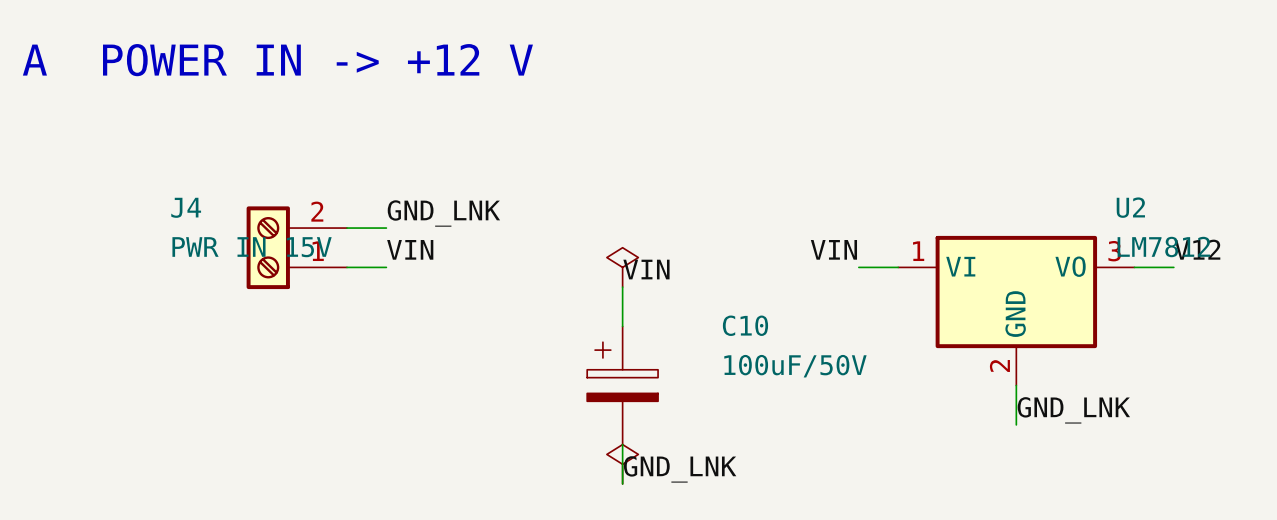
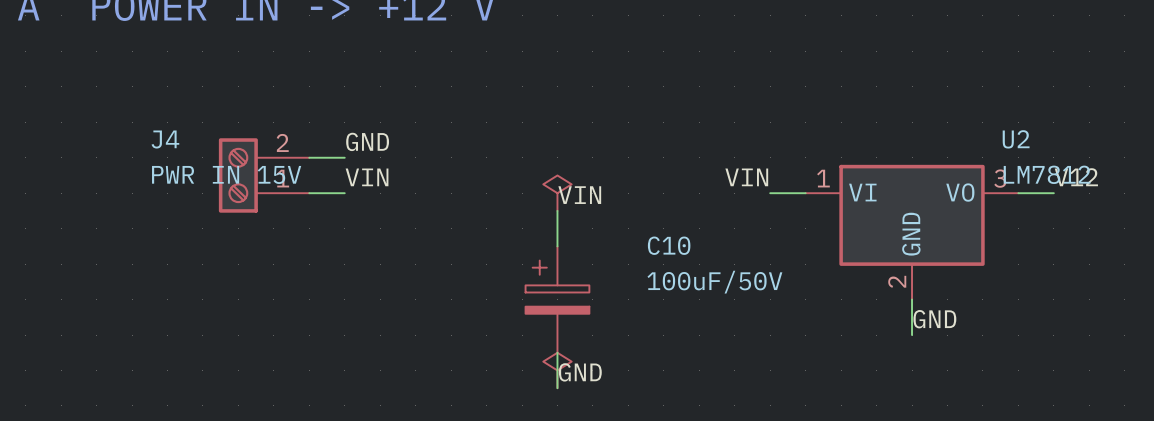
label: GND_LNK (443, 213) -> GND (367, 141)
label: GND_LNK (1073, 410) -> GND (934, 319)
label: GND_LNK (680, 469) -> GND (580, 372)

